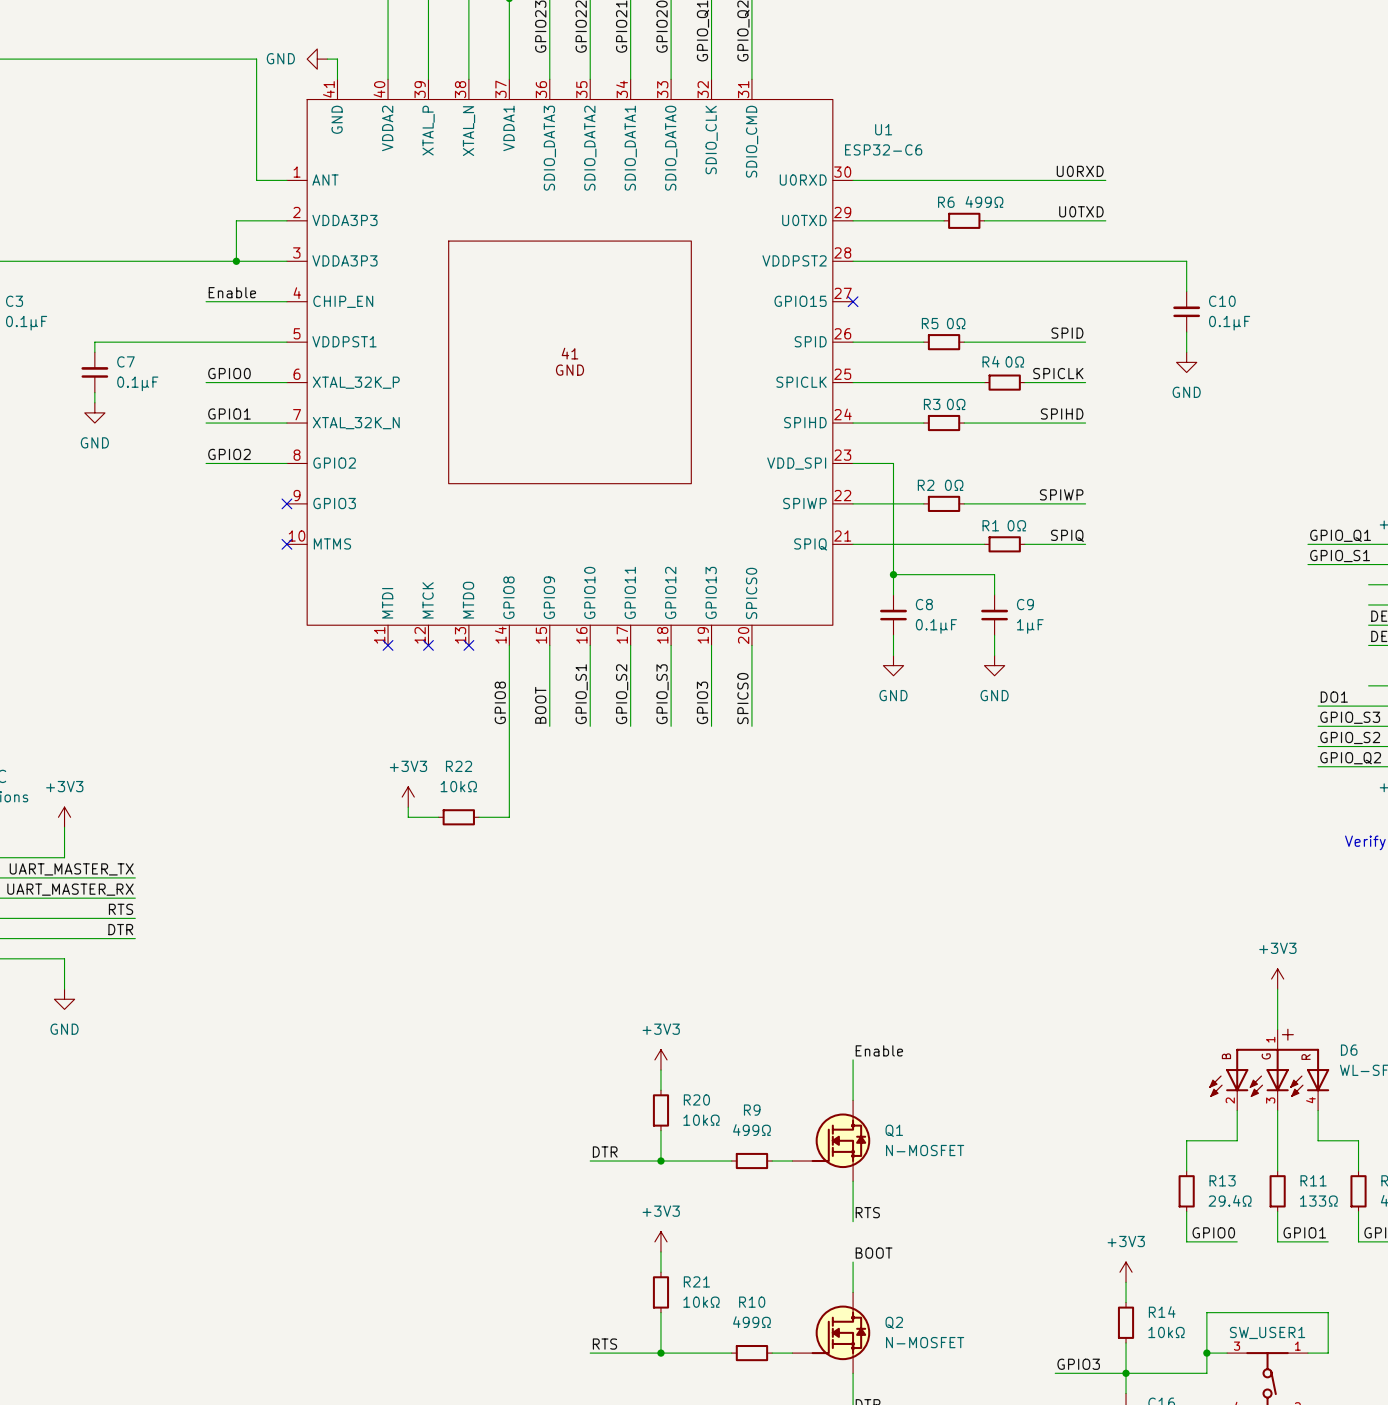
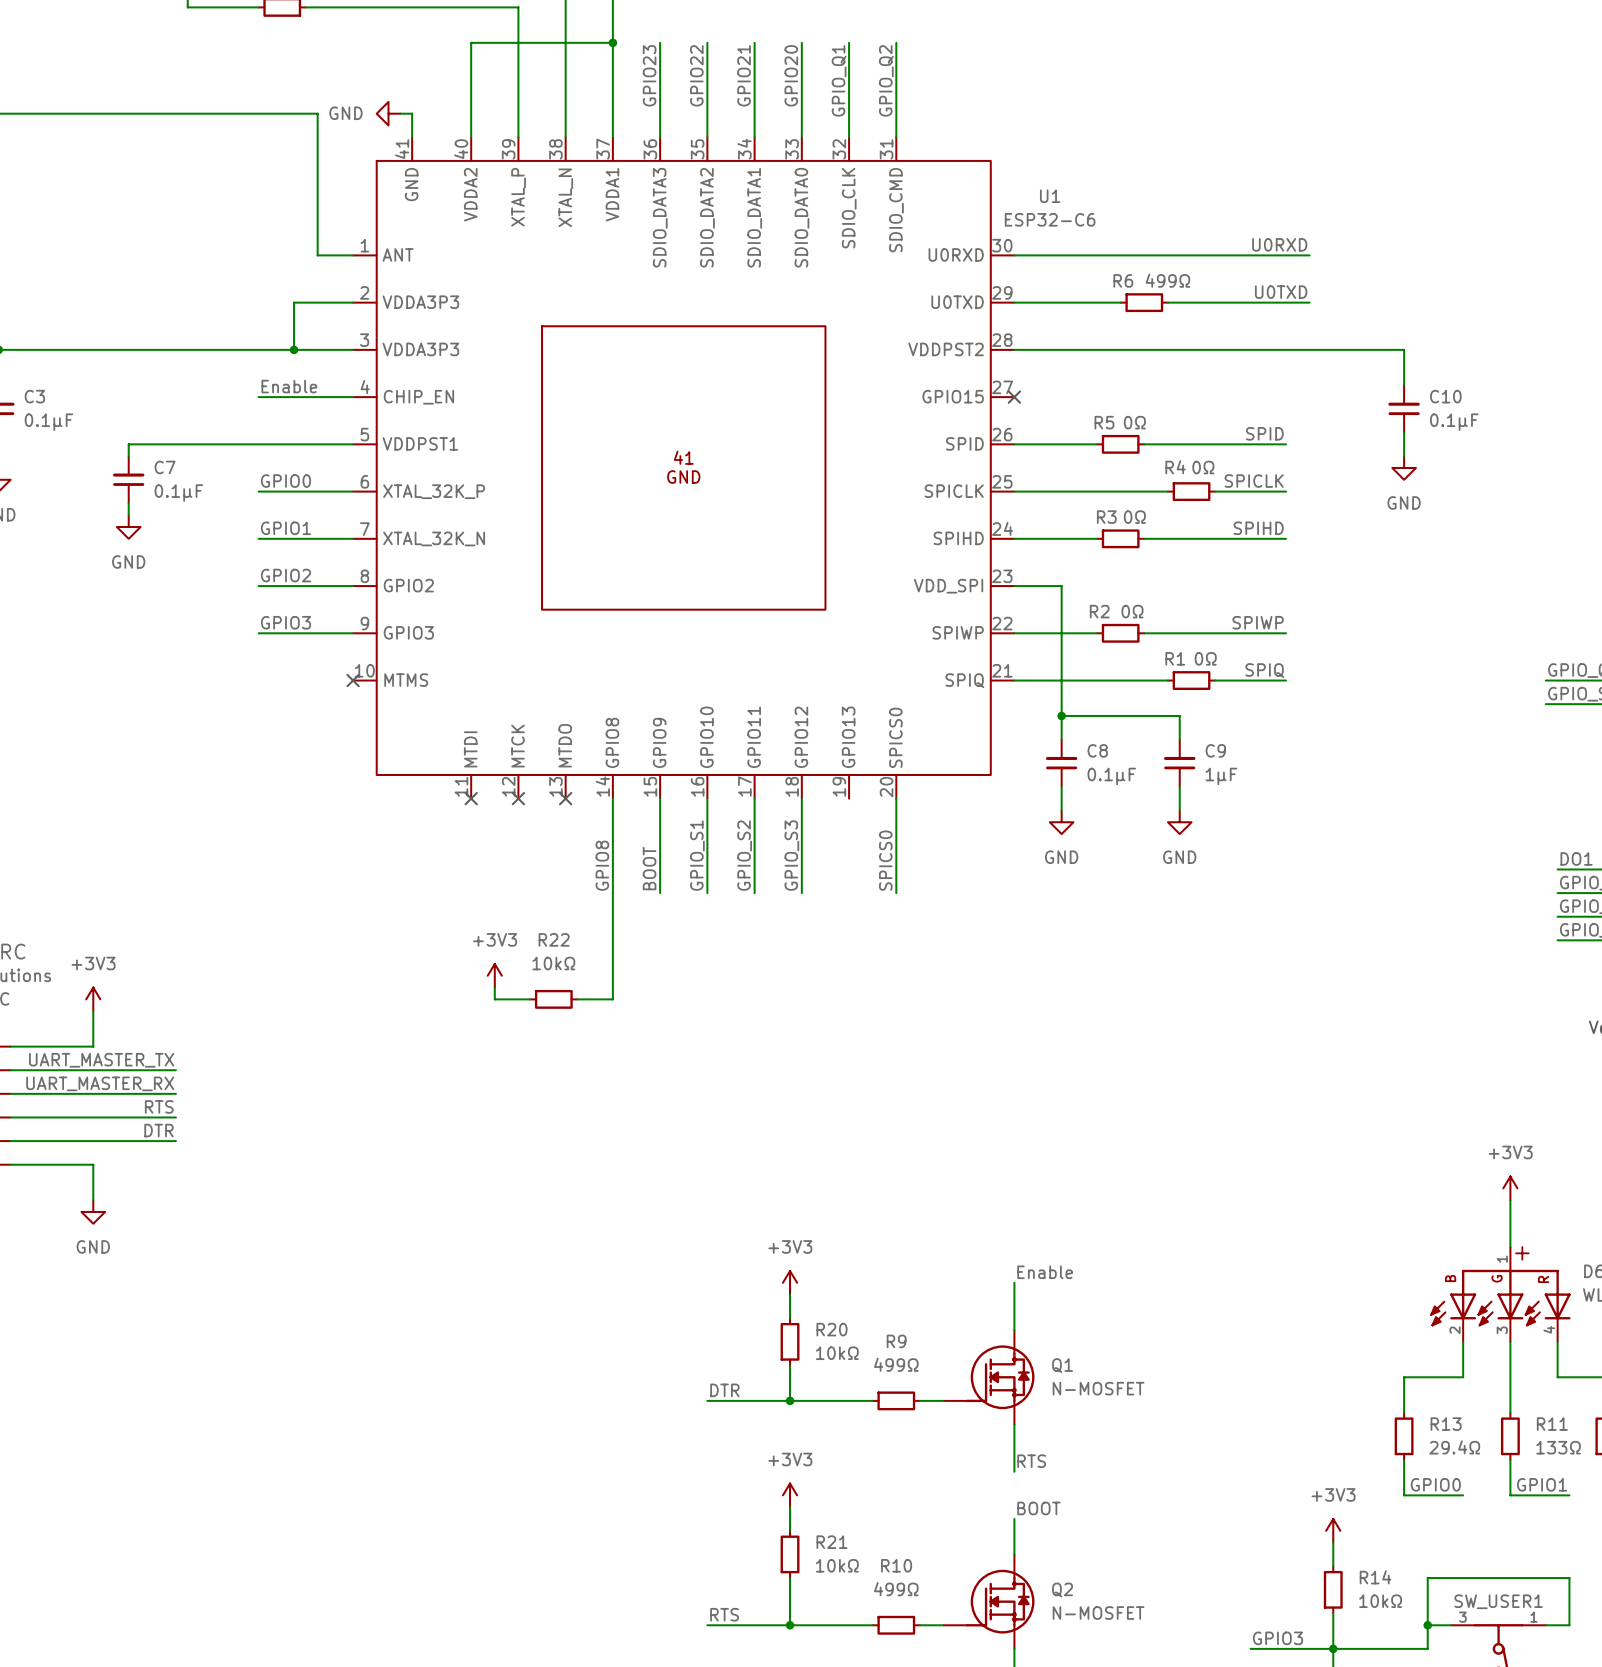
label: none -> GPIO3 (285, 622)
wire: none -> (258, 633) (353, 633)
no-connect mark: (286, 503) -> none
wire: (711, 645) (711, 726) -> none
label: GPIO3 (702, 702) -> none

